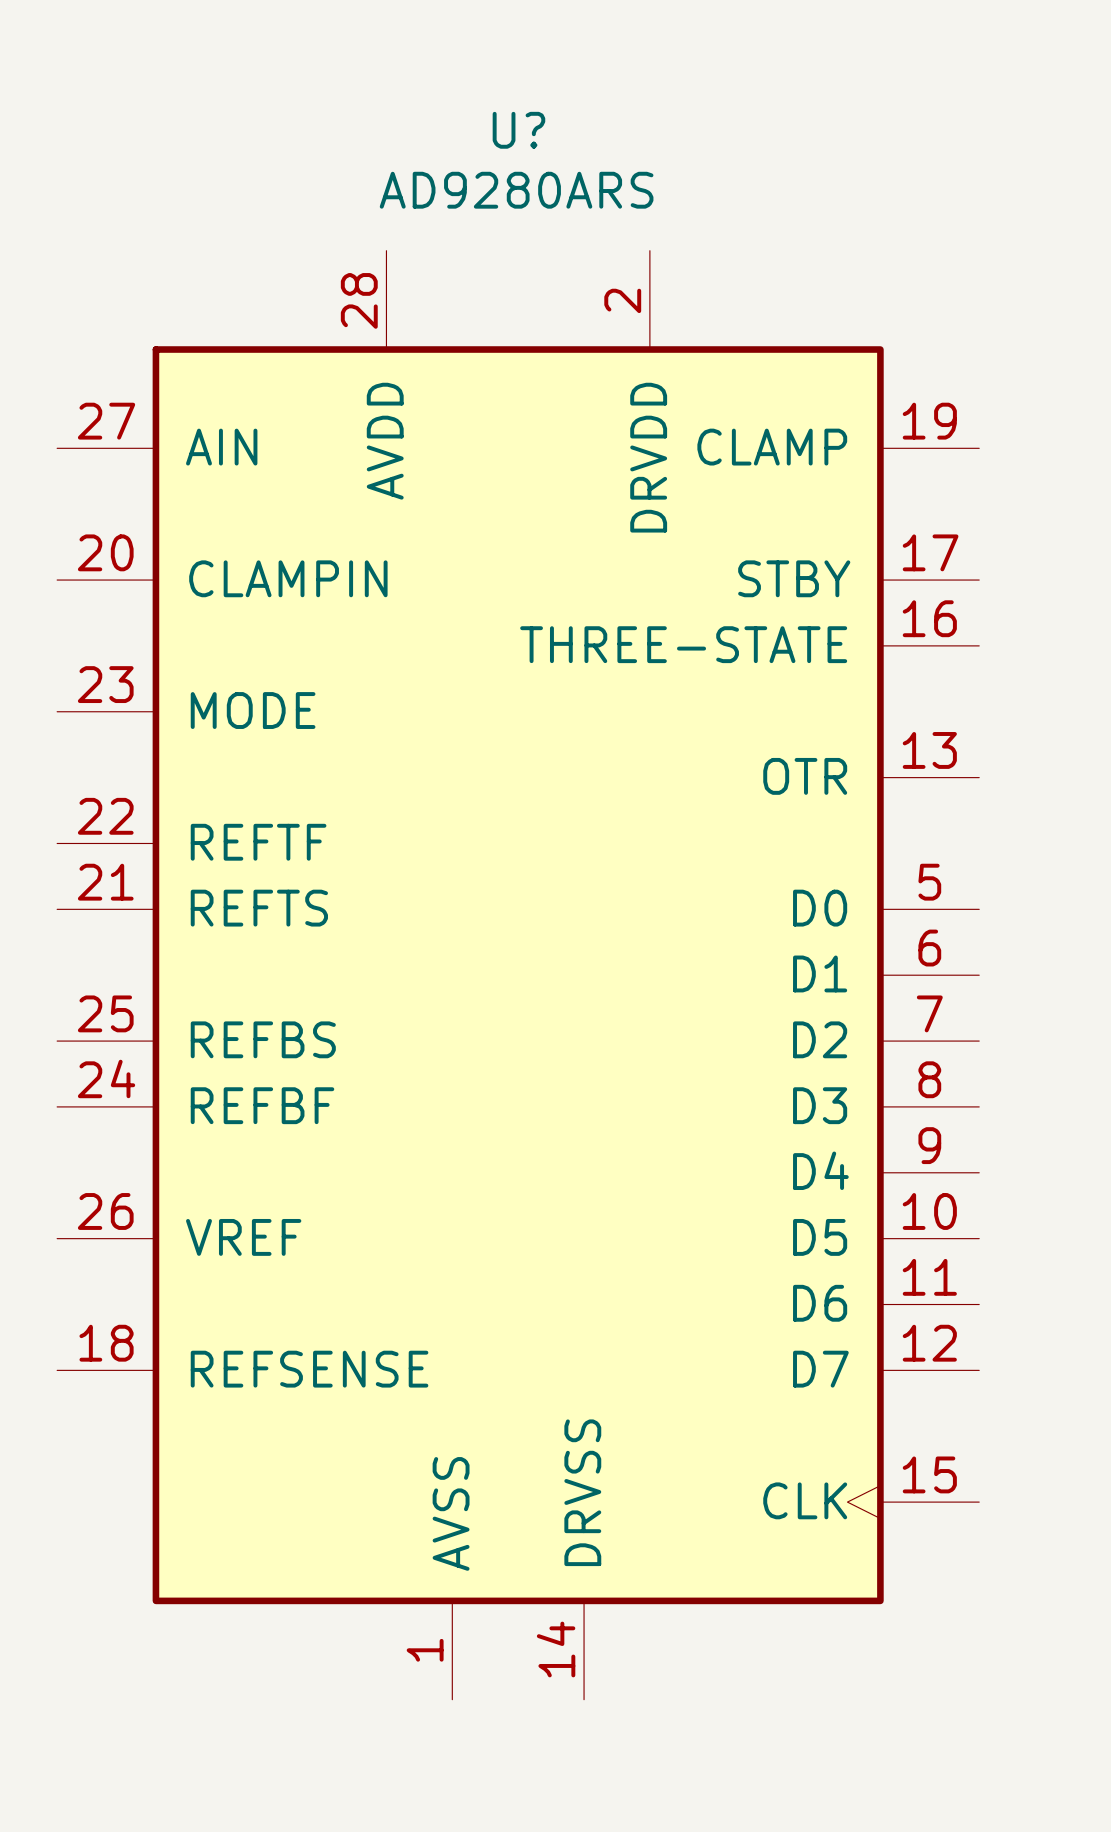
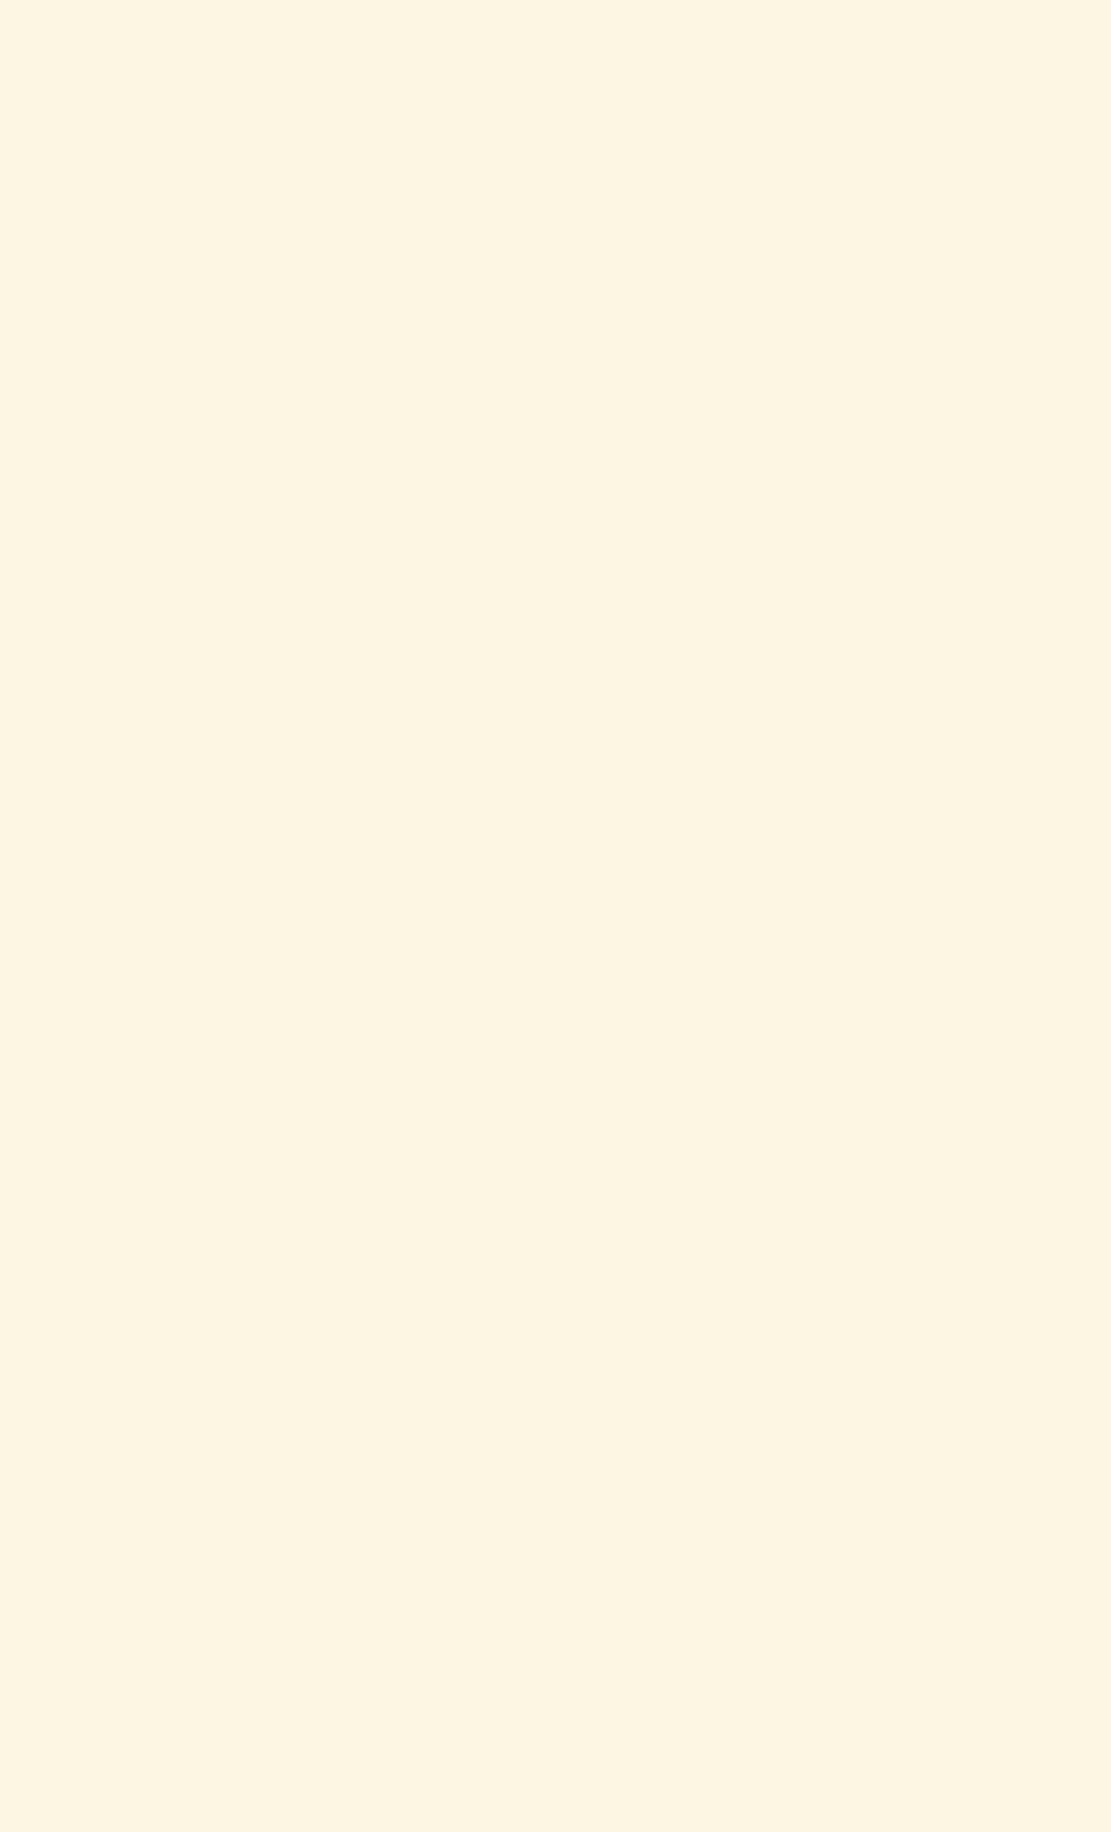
U?: AD9280ARS (518, 975) -> none

